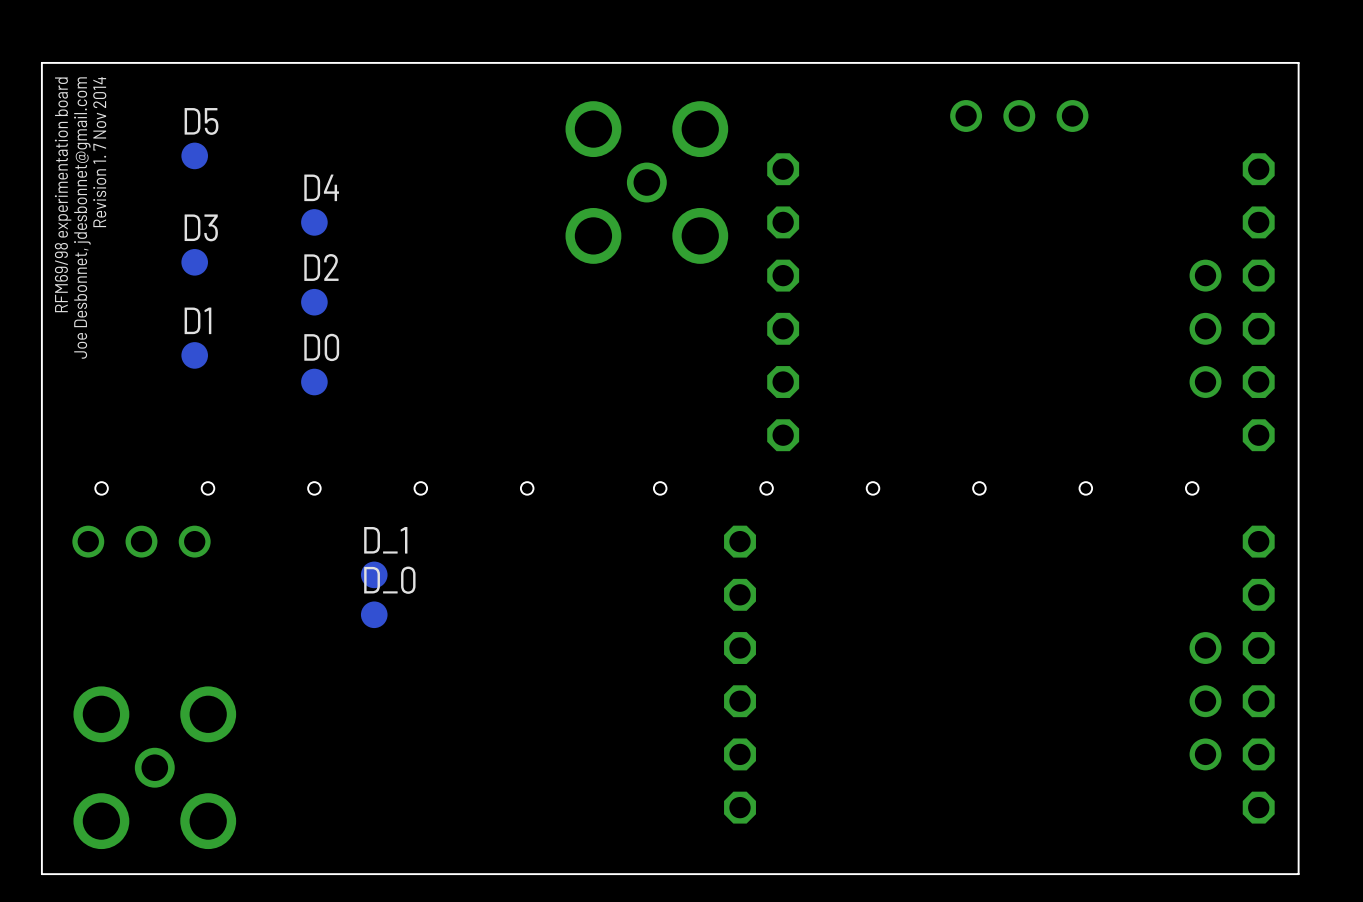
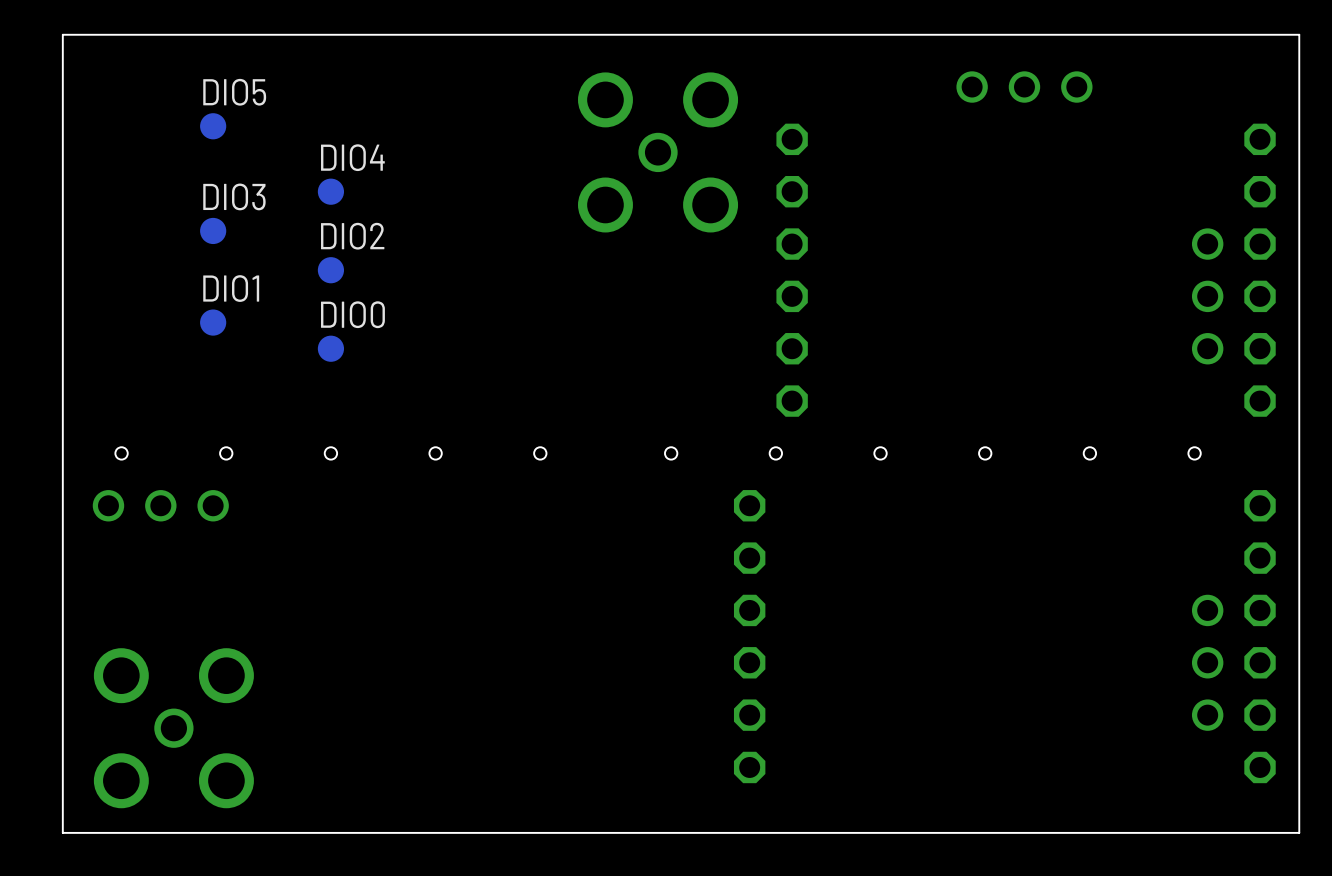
D5 name: D5 (201, 121) -> DIO5 (234, 92)
text: Revision 1. 7 Nov 2014 (99, 152) -> none
D4 name: D4 (321, 187) -> DIO4 (352, 157)
text: RFM69/98 experimentation board (63, 194) -> none
text: Joe Desbonnet, jdesbonnet@gmail.com (82, 218) -> none
D3 name: D3 (201, 227) -> DIO3 (234, 196)
D2 name: D2 (321, 267) -> DIO2 (352, 236)
D1 name: D1 (197, 320) -> DIO1 (231, 288)
D0 name: D0 (321, 347) -> DIO0 (352, 314)
D_1: (374, 574) -> none
D_0: (374, 614) -> none

